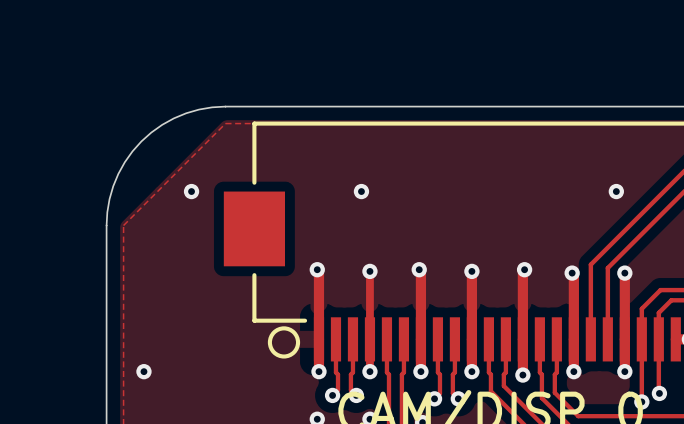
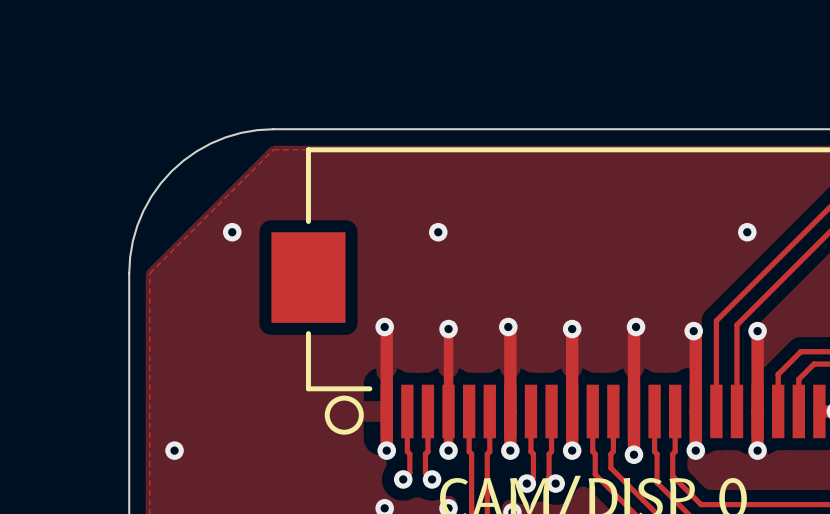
track: (641, 339) (641, 401) -> none
track: (658, 339) (659, 393) -> none
via: (659, 393) -> none
via: (641, 401) -> none

